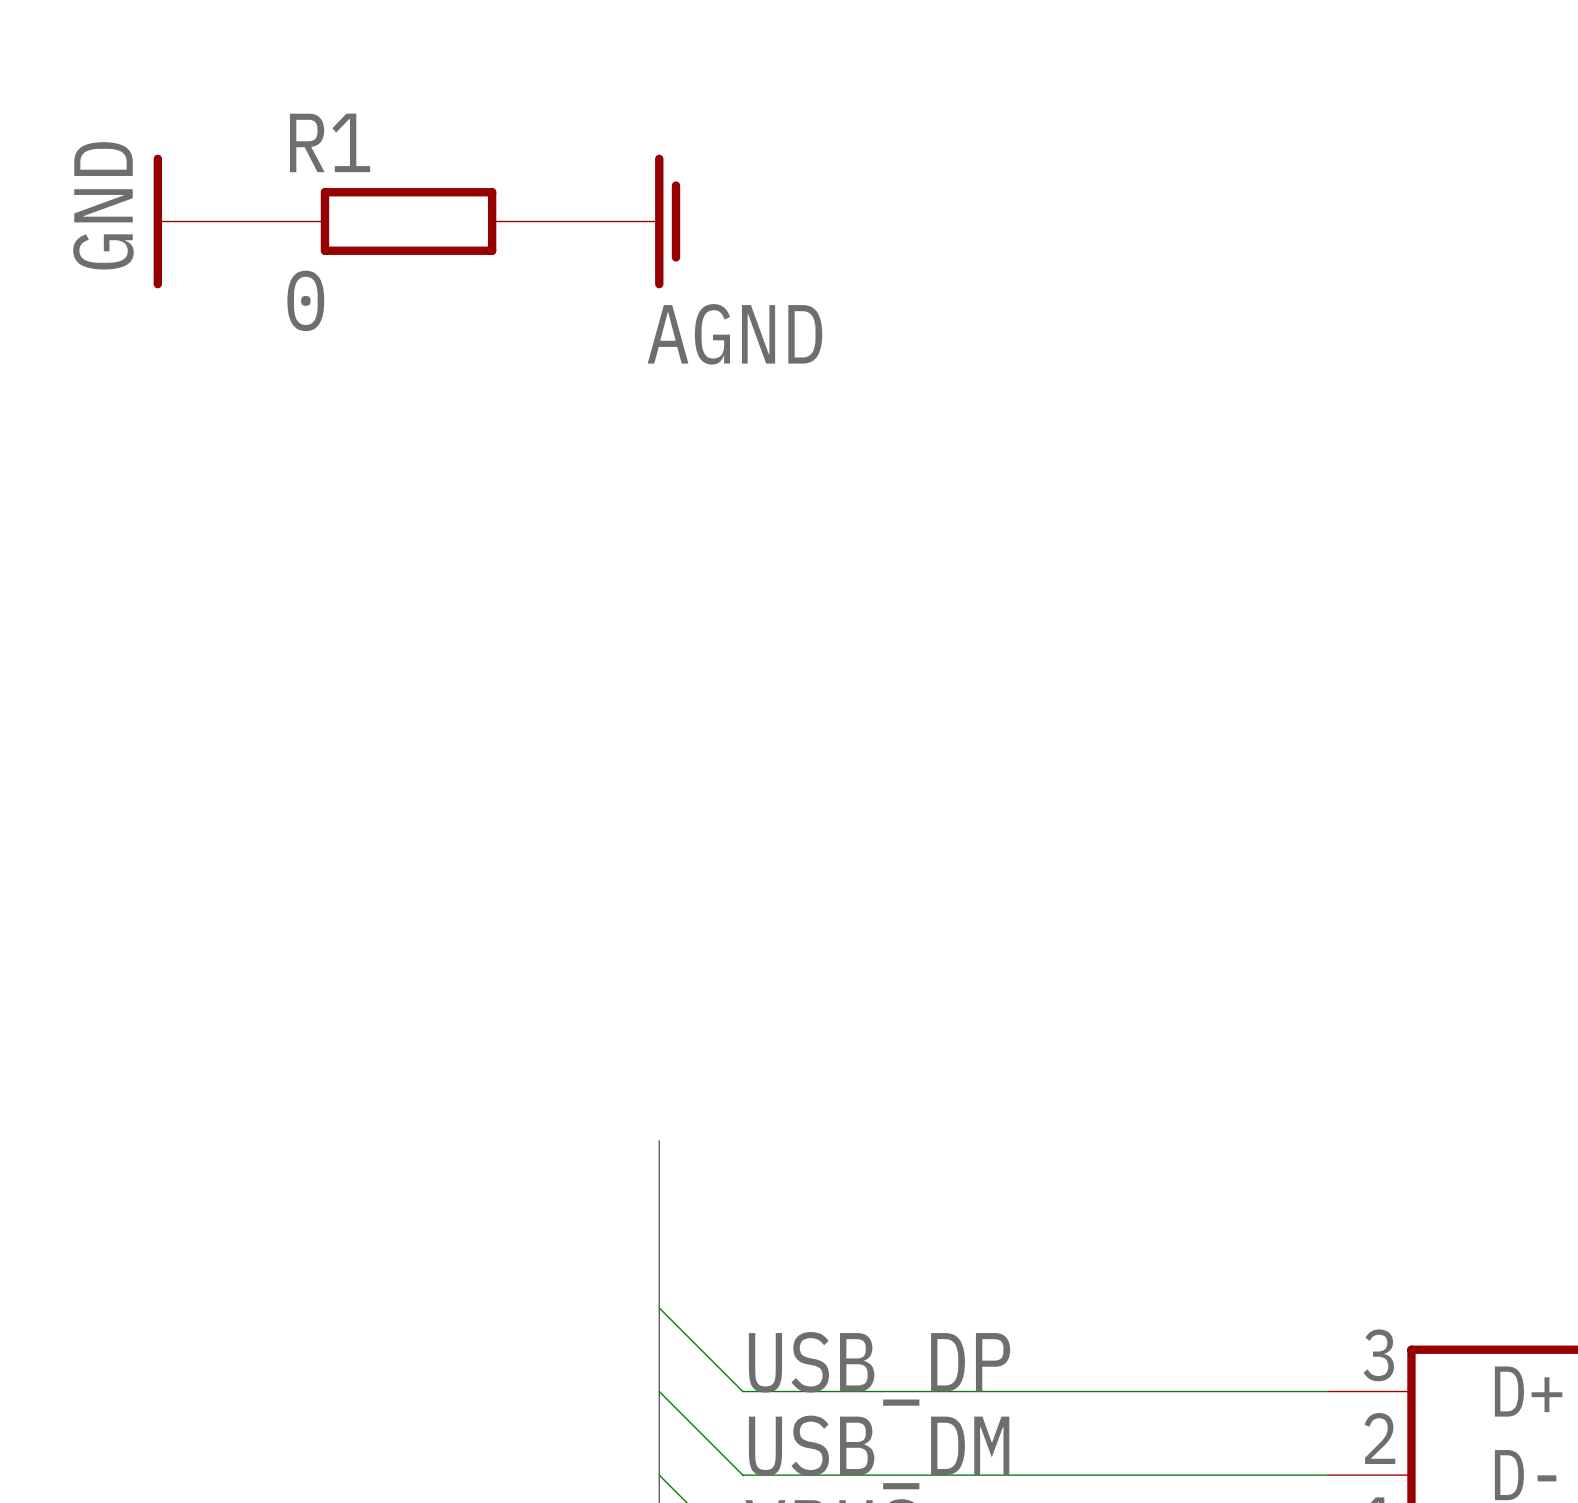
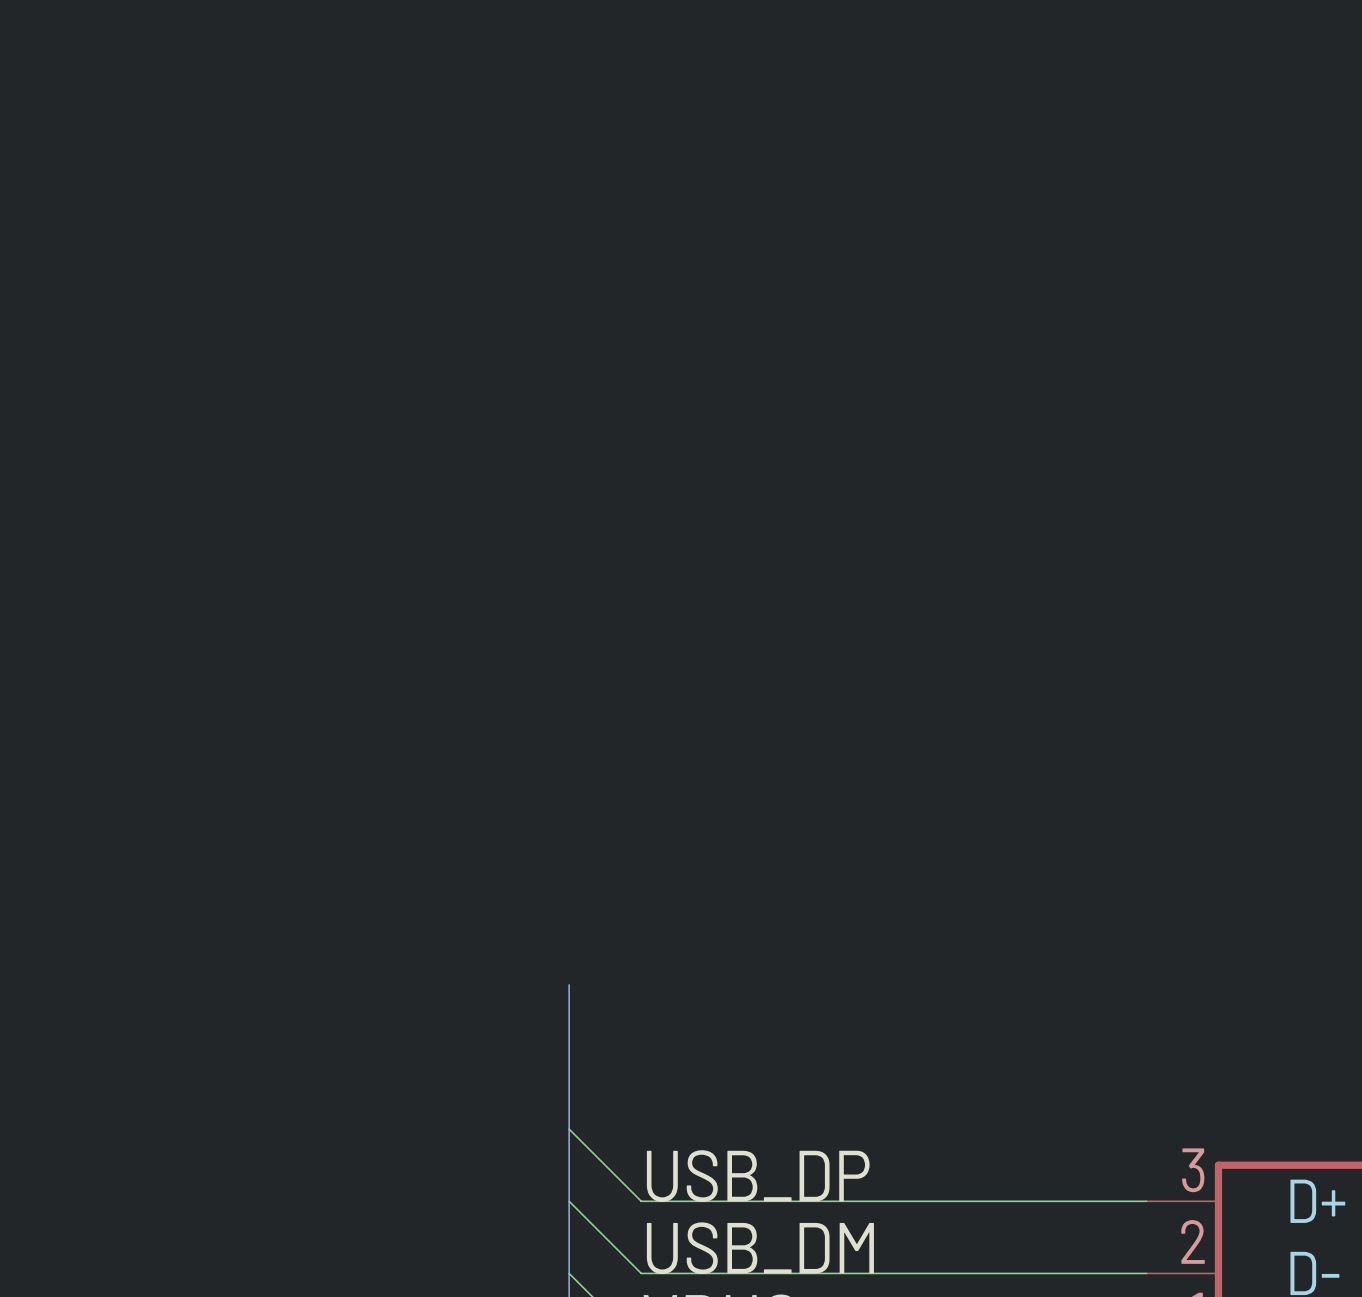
power symbol: GND (197, 221) -> none
R1: 0 (408, 221) -> none
power symbol: AGND (627, 221) -> none

